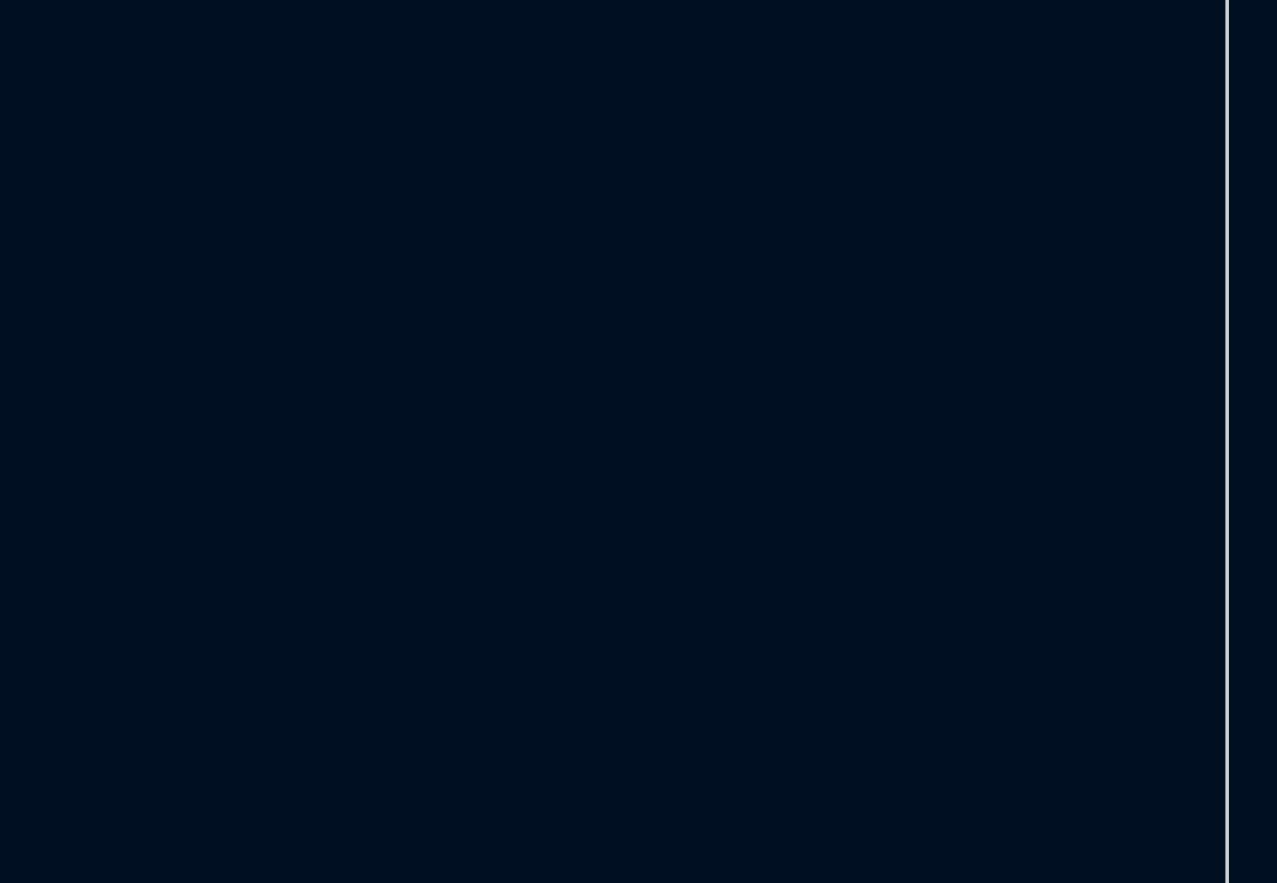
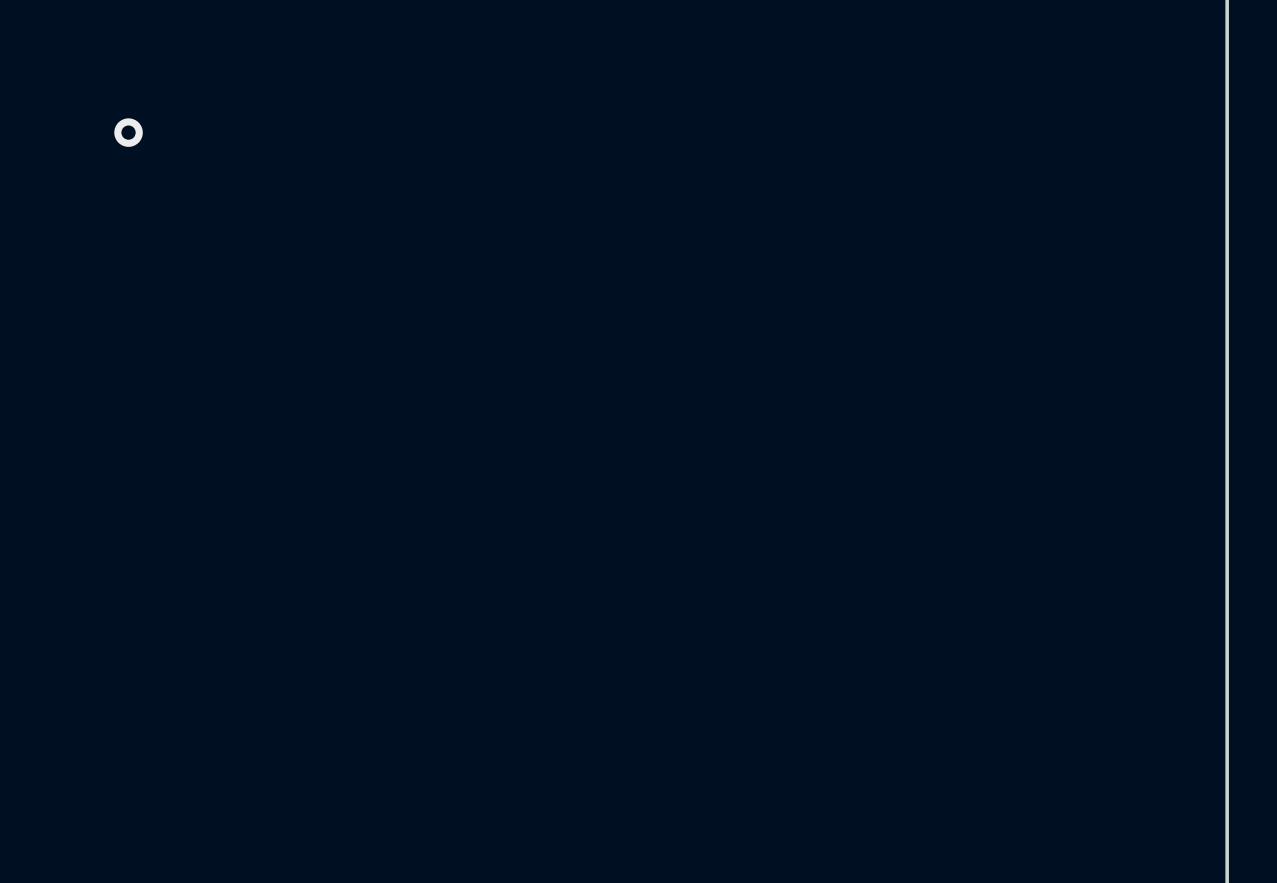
via: none -> (128, 132)

